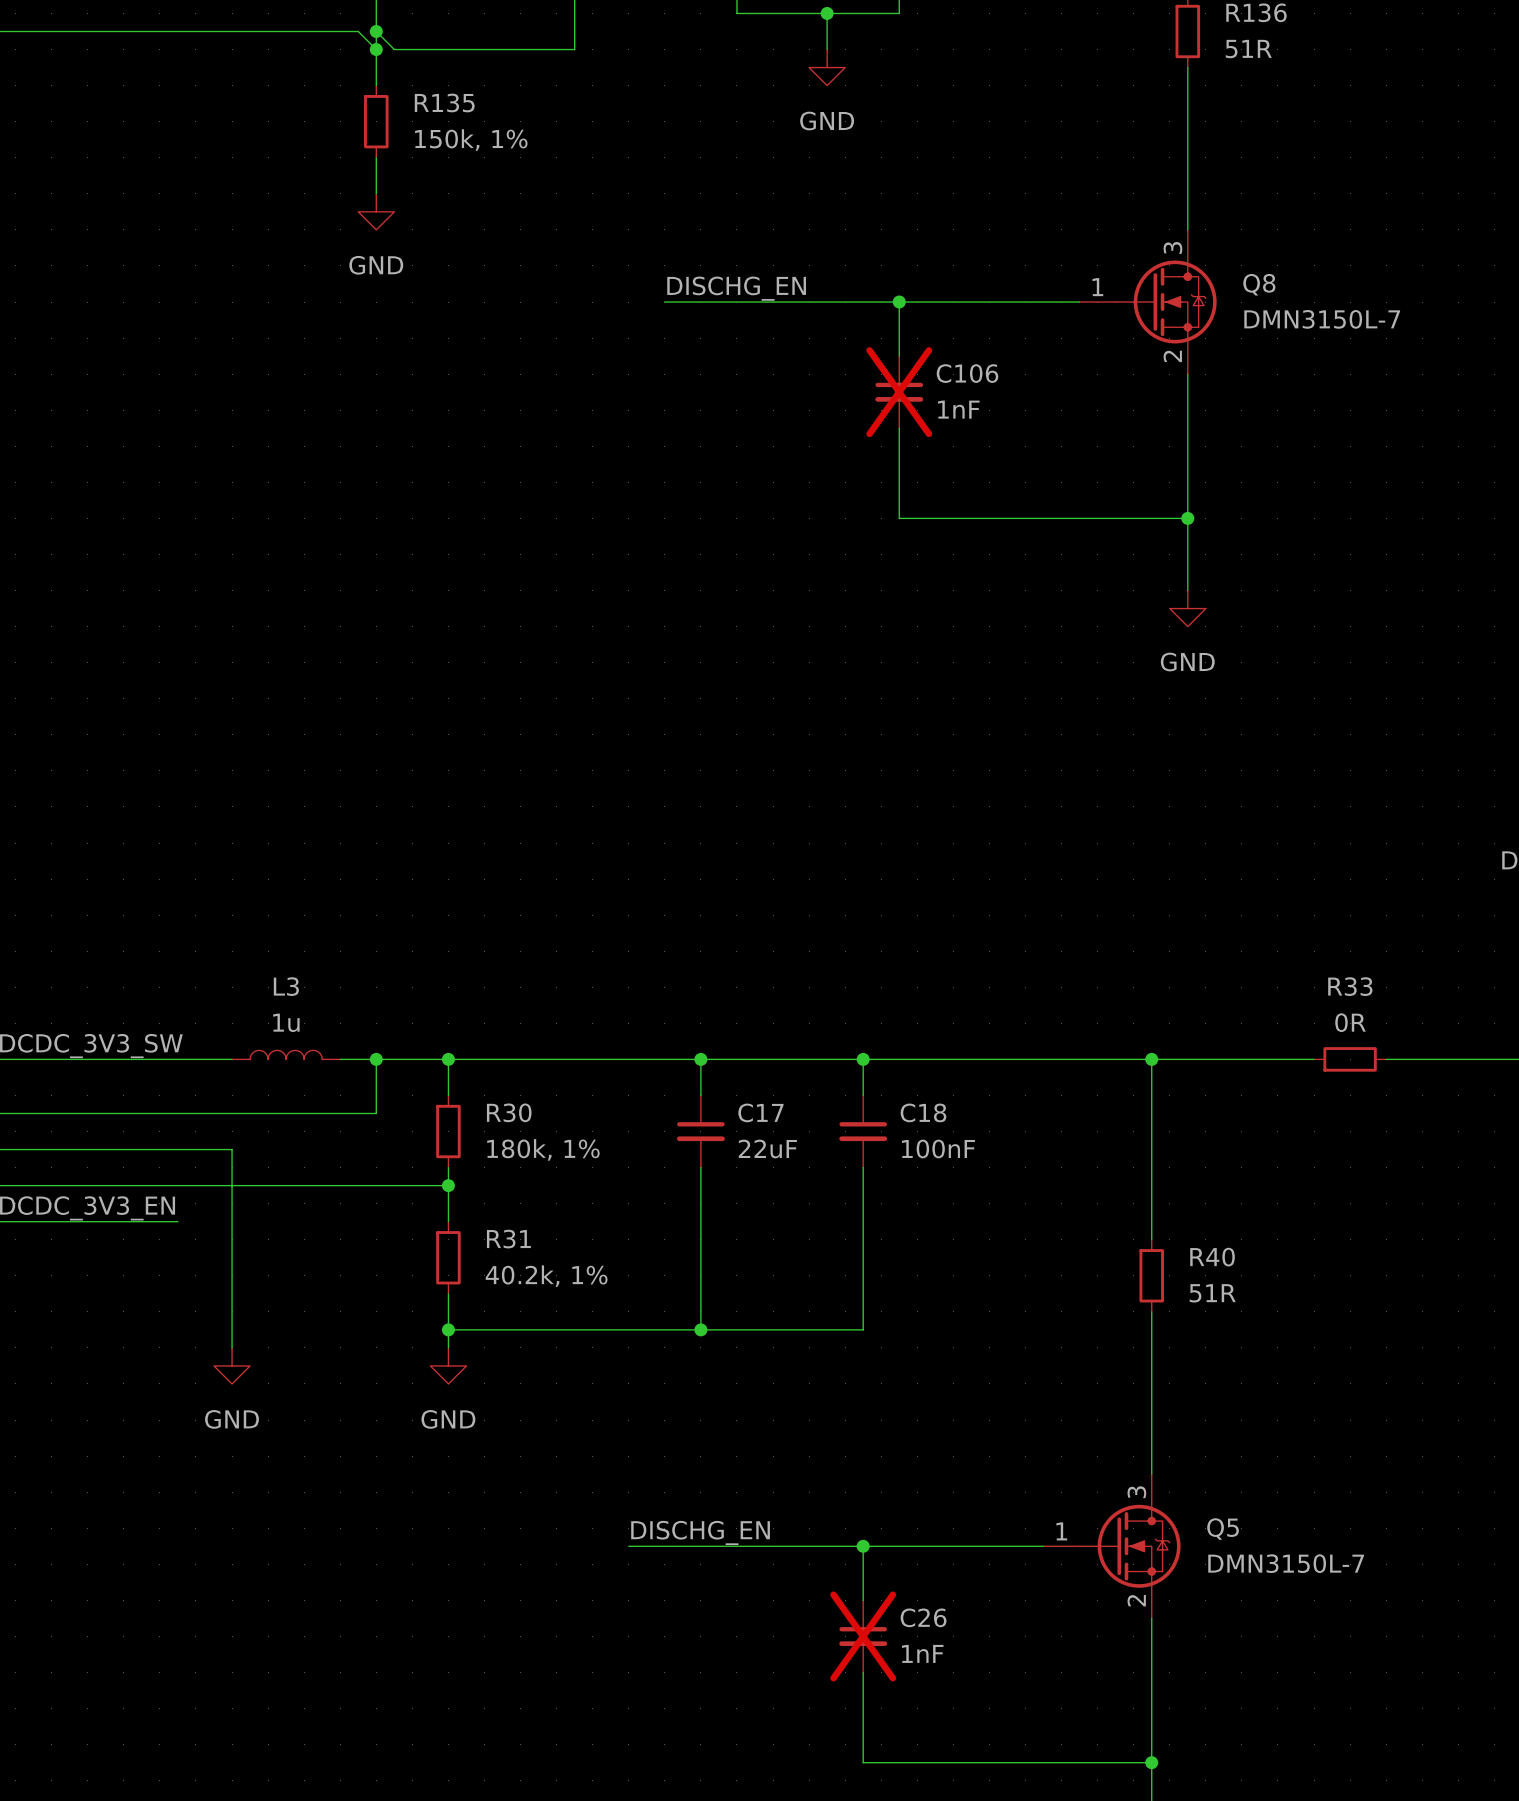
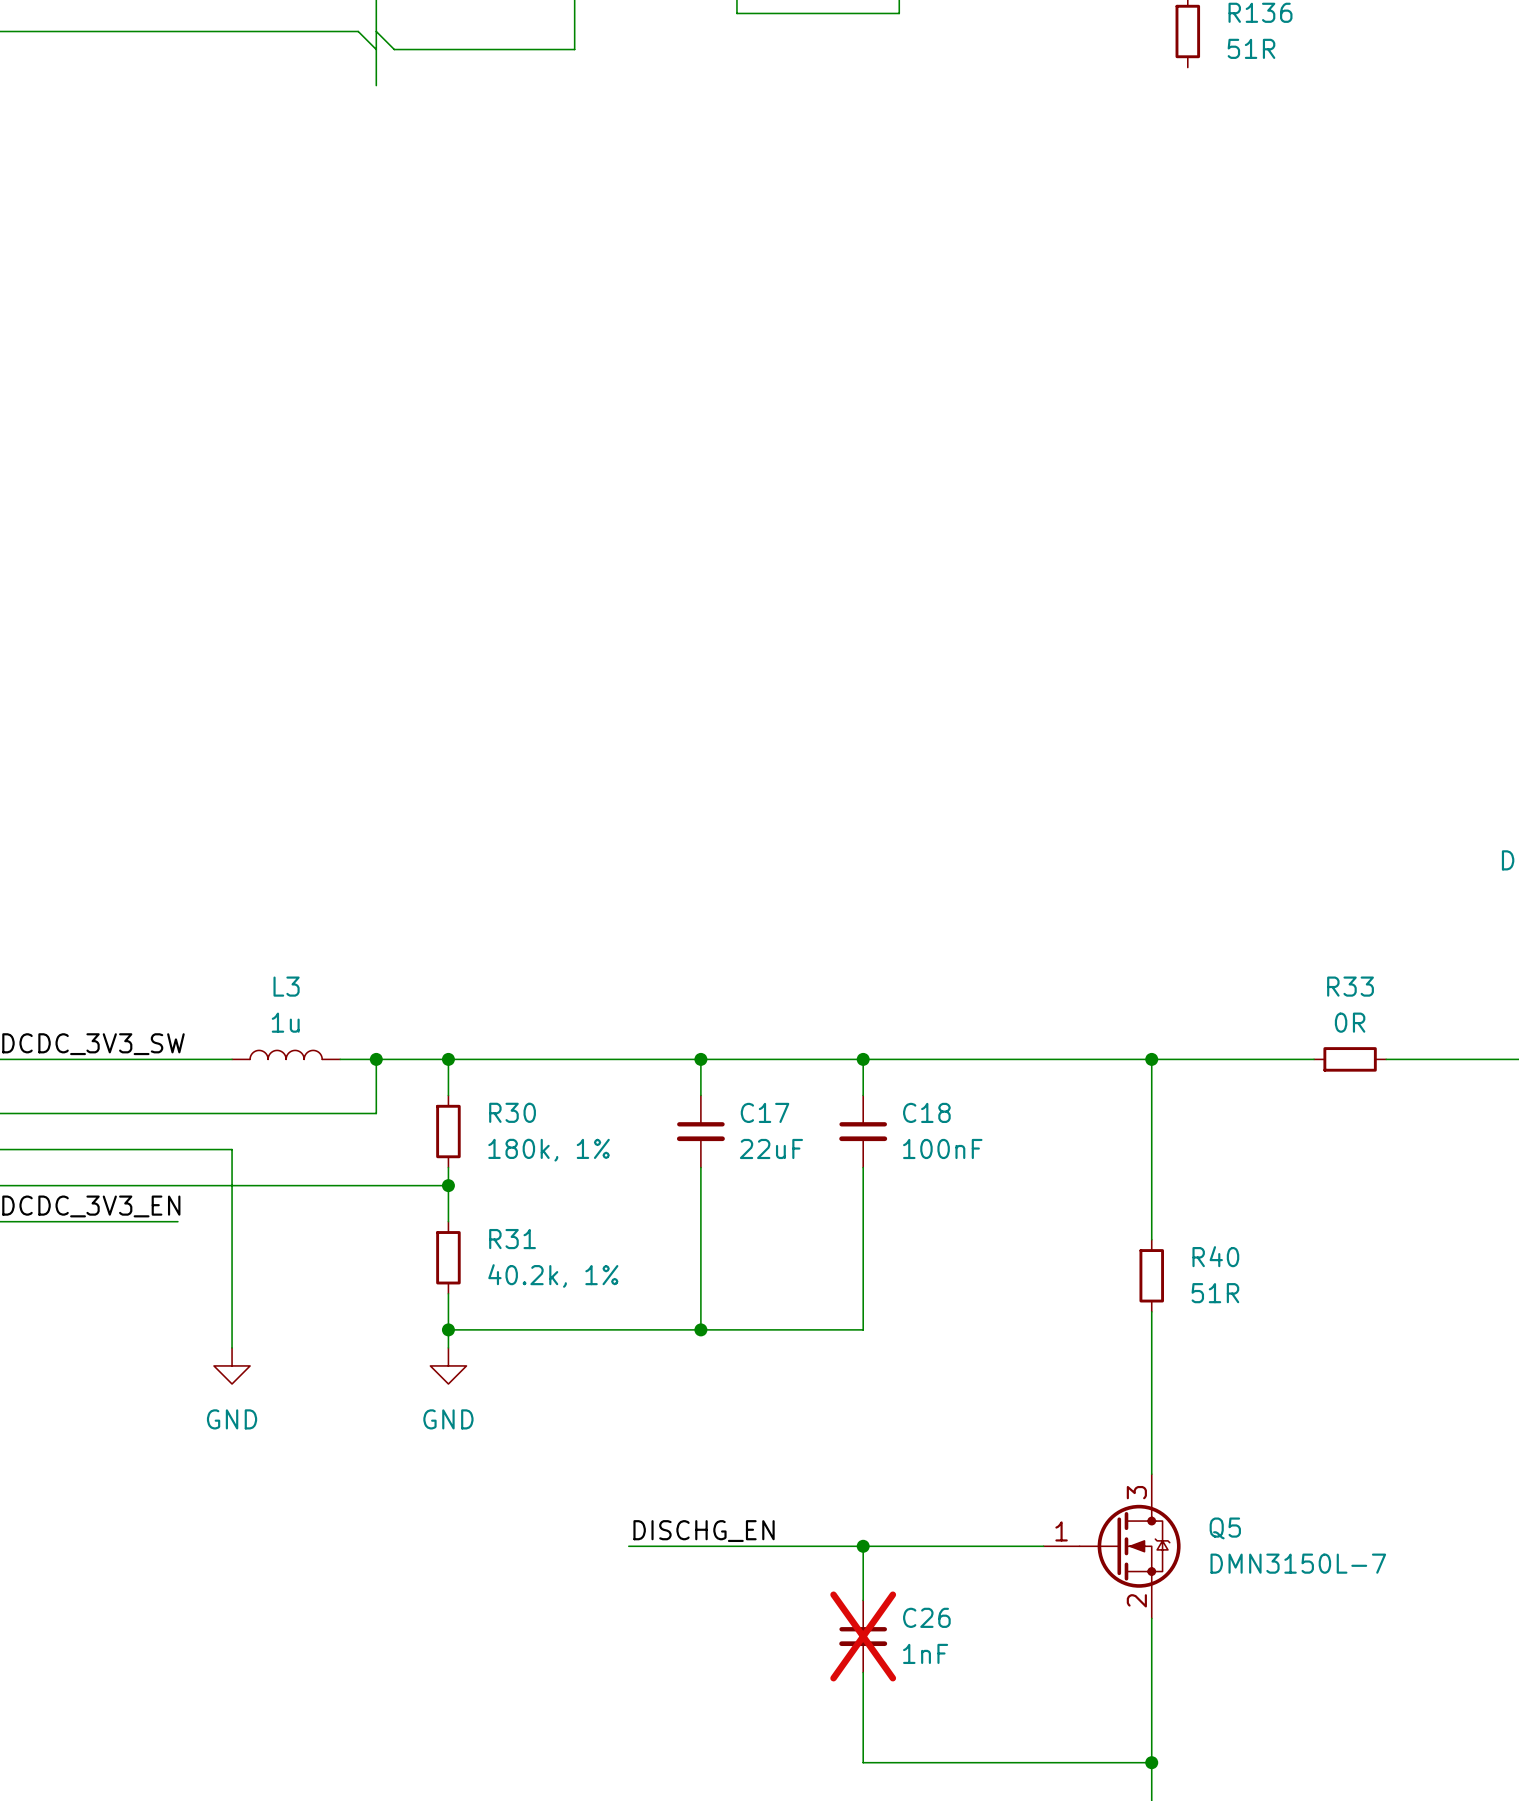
wire: (827, 13) (827, 49) -> none
junction: (827, 13) -> none
junction: (376, 31) -> none
junction: (376, 49) -> none
power symbol: GND (827, 67) -> none
wire: (1187, 67) (1187, 229) -> none
R135: 150k, 1% (376, 121) -> none
wire: (376, 157) (376, 193) -> none
power symbol: GND (376, 211) -> none
label: DISCHG_EN (736, 288) -> none
wire: (664, 302) (1079, 302) -> none
wire: (899, 302) (899, 356) -> none
junction: (899, 302) -> none
Q8: DMN3150L-7 (1148, 302) -> none
wire: (1187, 374) (1187, 590) -> none
C106: 1nF (899, 392) -> none
wire: (899, 428) (899, 518) (1187, 518) -> none
junction: (1187, 518) -> none
power symbol: GND (1187, 608) -> none

